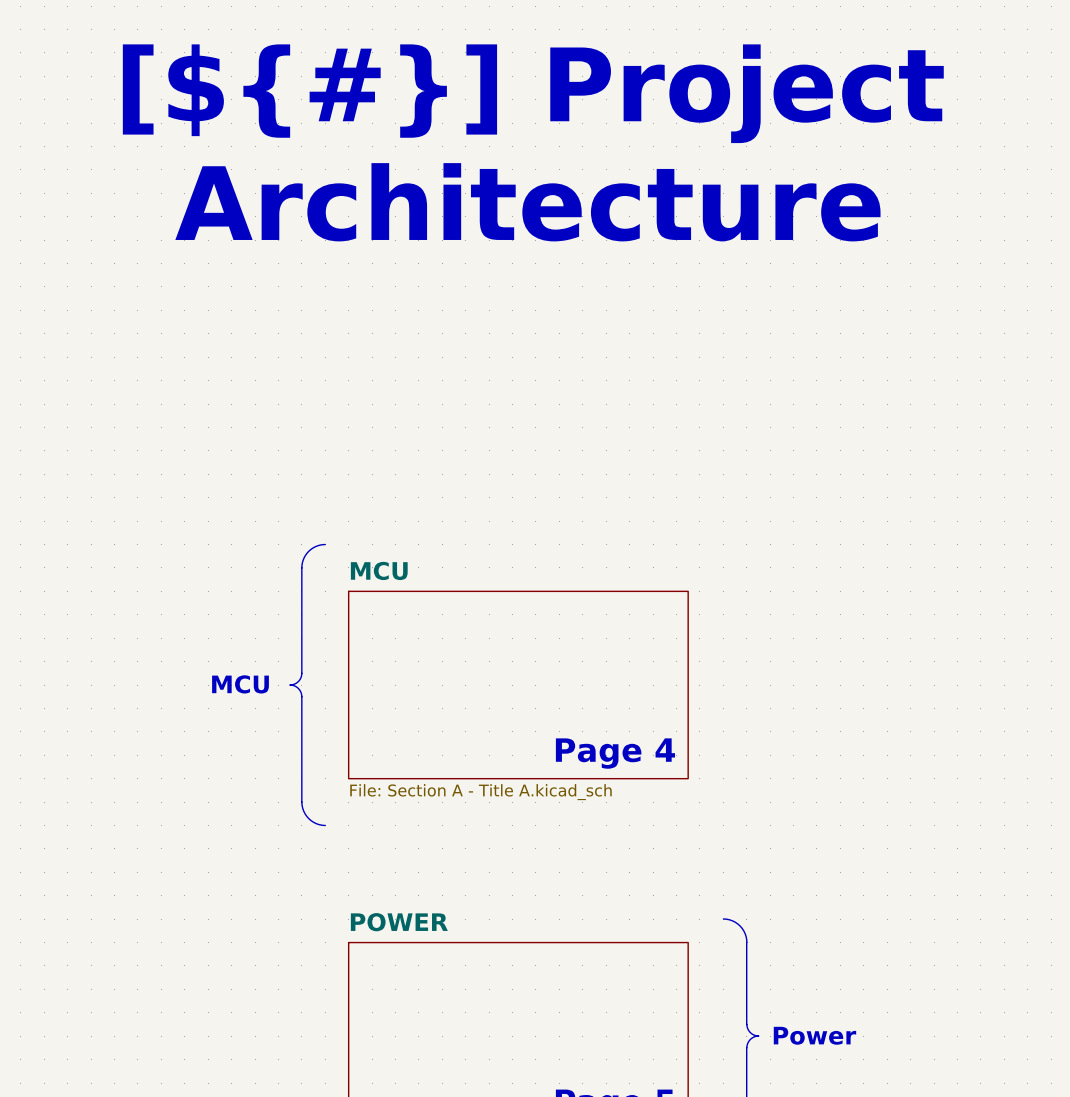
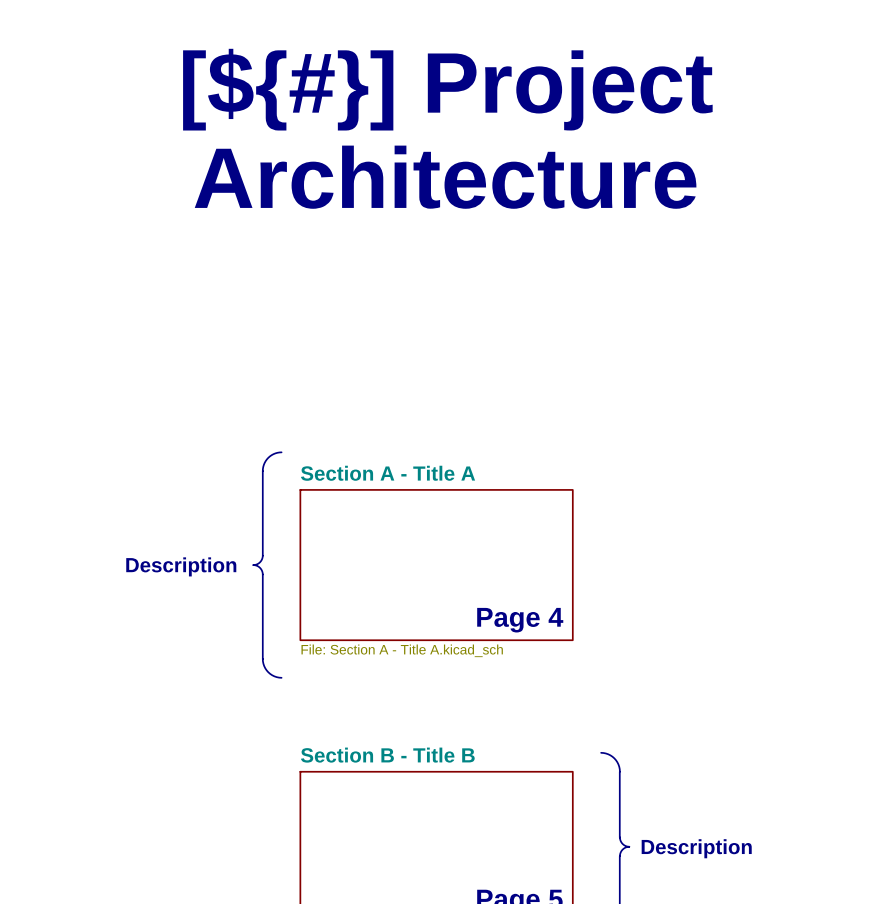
sheet MCU name: MCU (379, 570) -> Section A - Title A (388, 473)
text: MCU (240, 684) -> Description (181, 566)
sheet POWER name: POWER (399, 922) -> Section B - Title B (387, 755)
text: Power (814, 1035) -> Description (696, 848)

